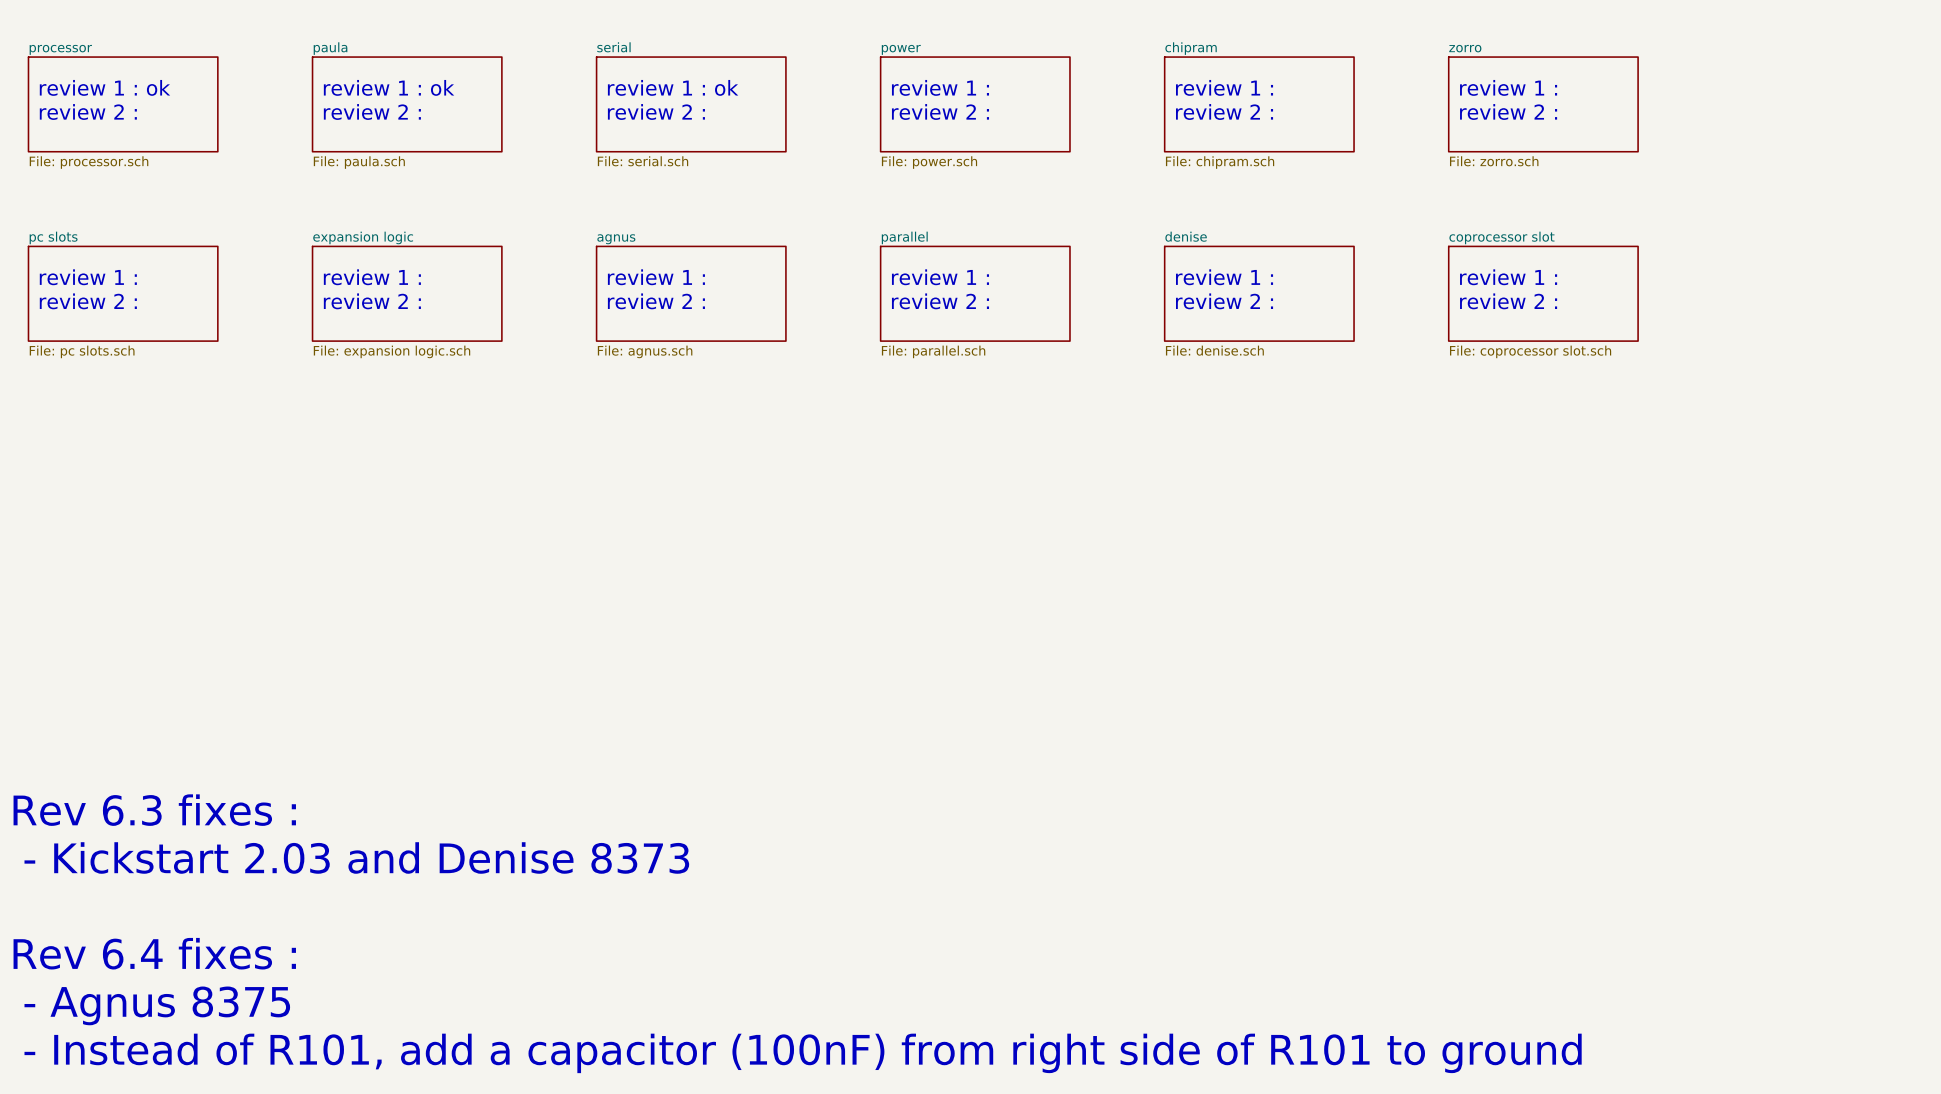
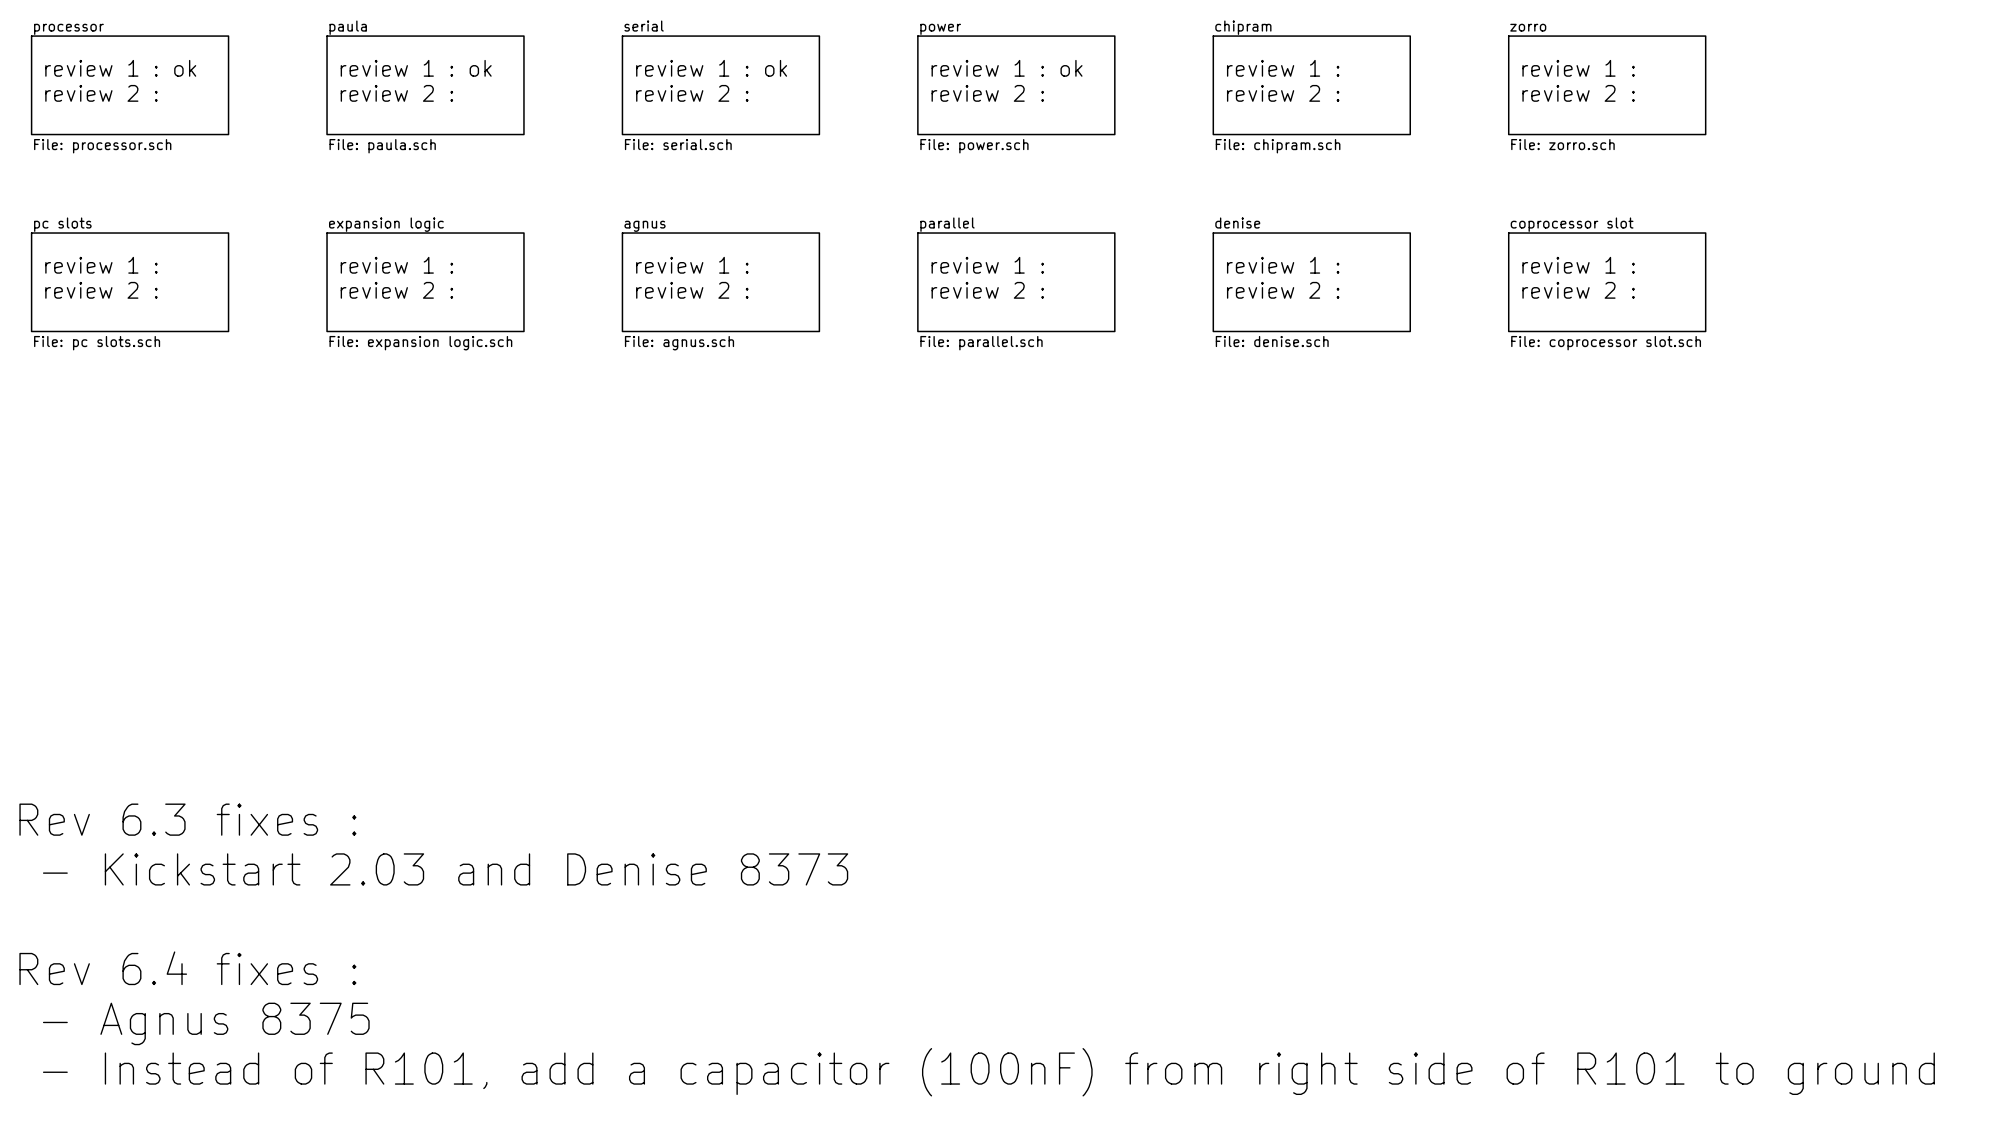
text: review 1 : (940, 87) -> review 1 : ok (1007, 68)

